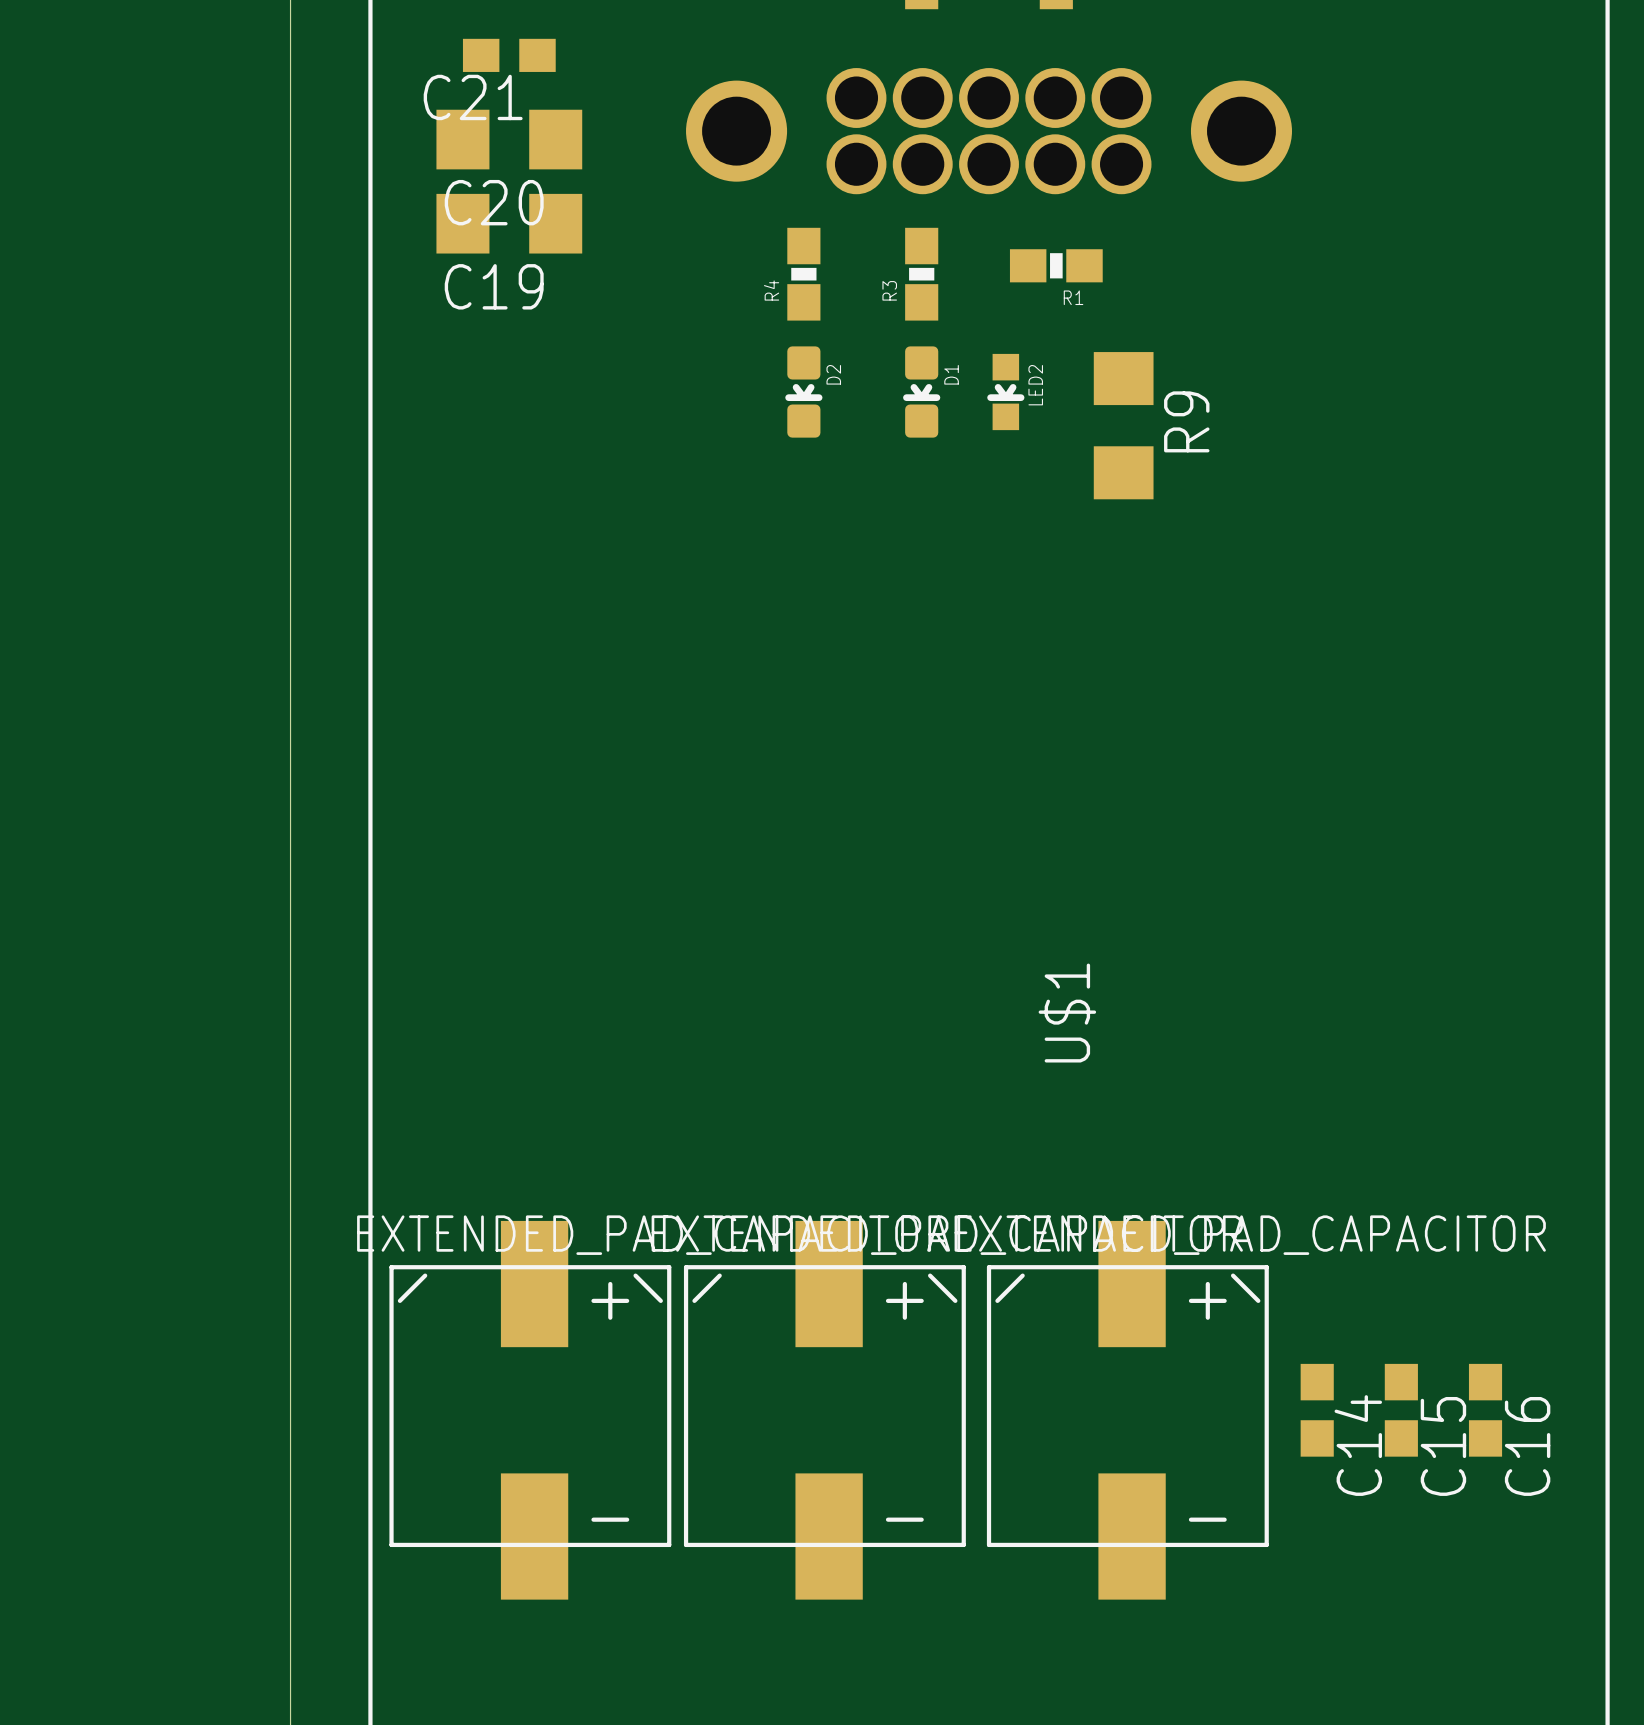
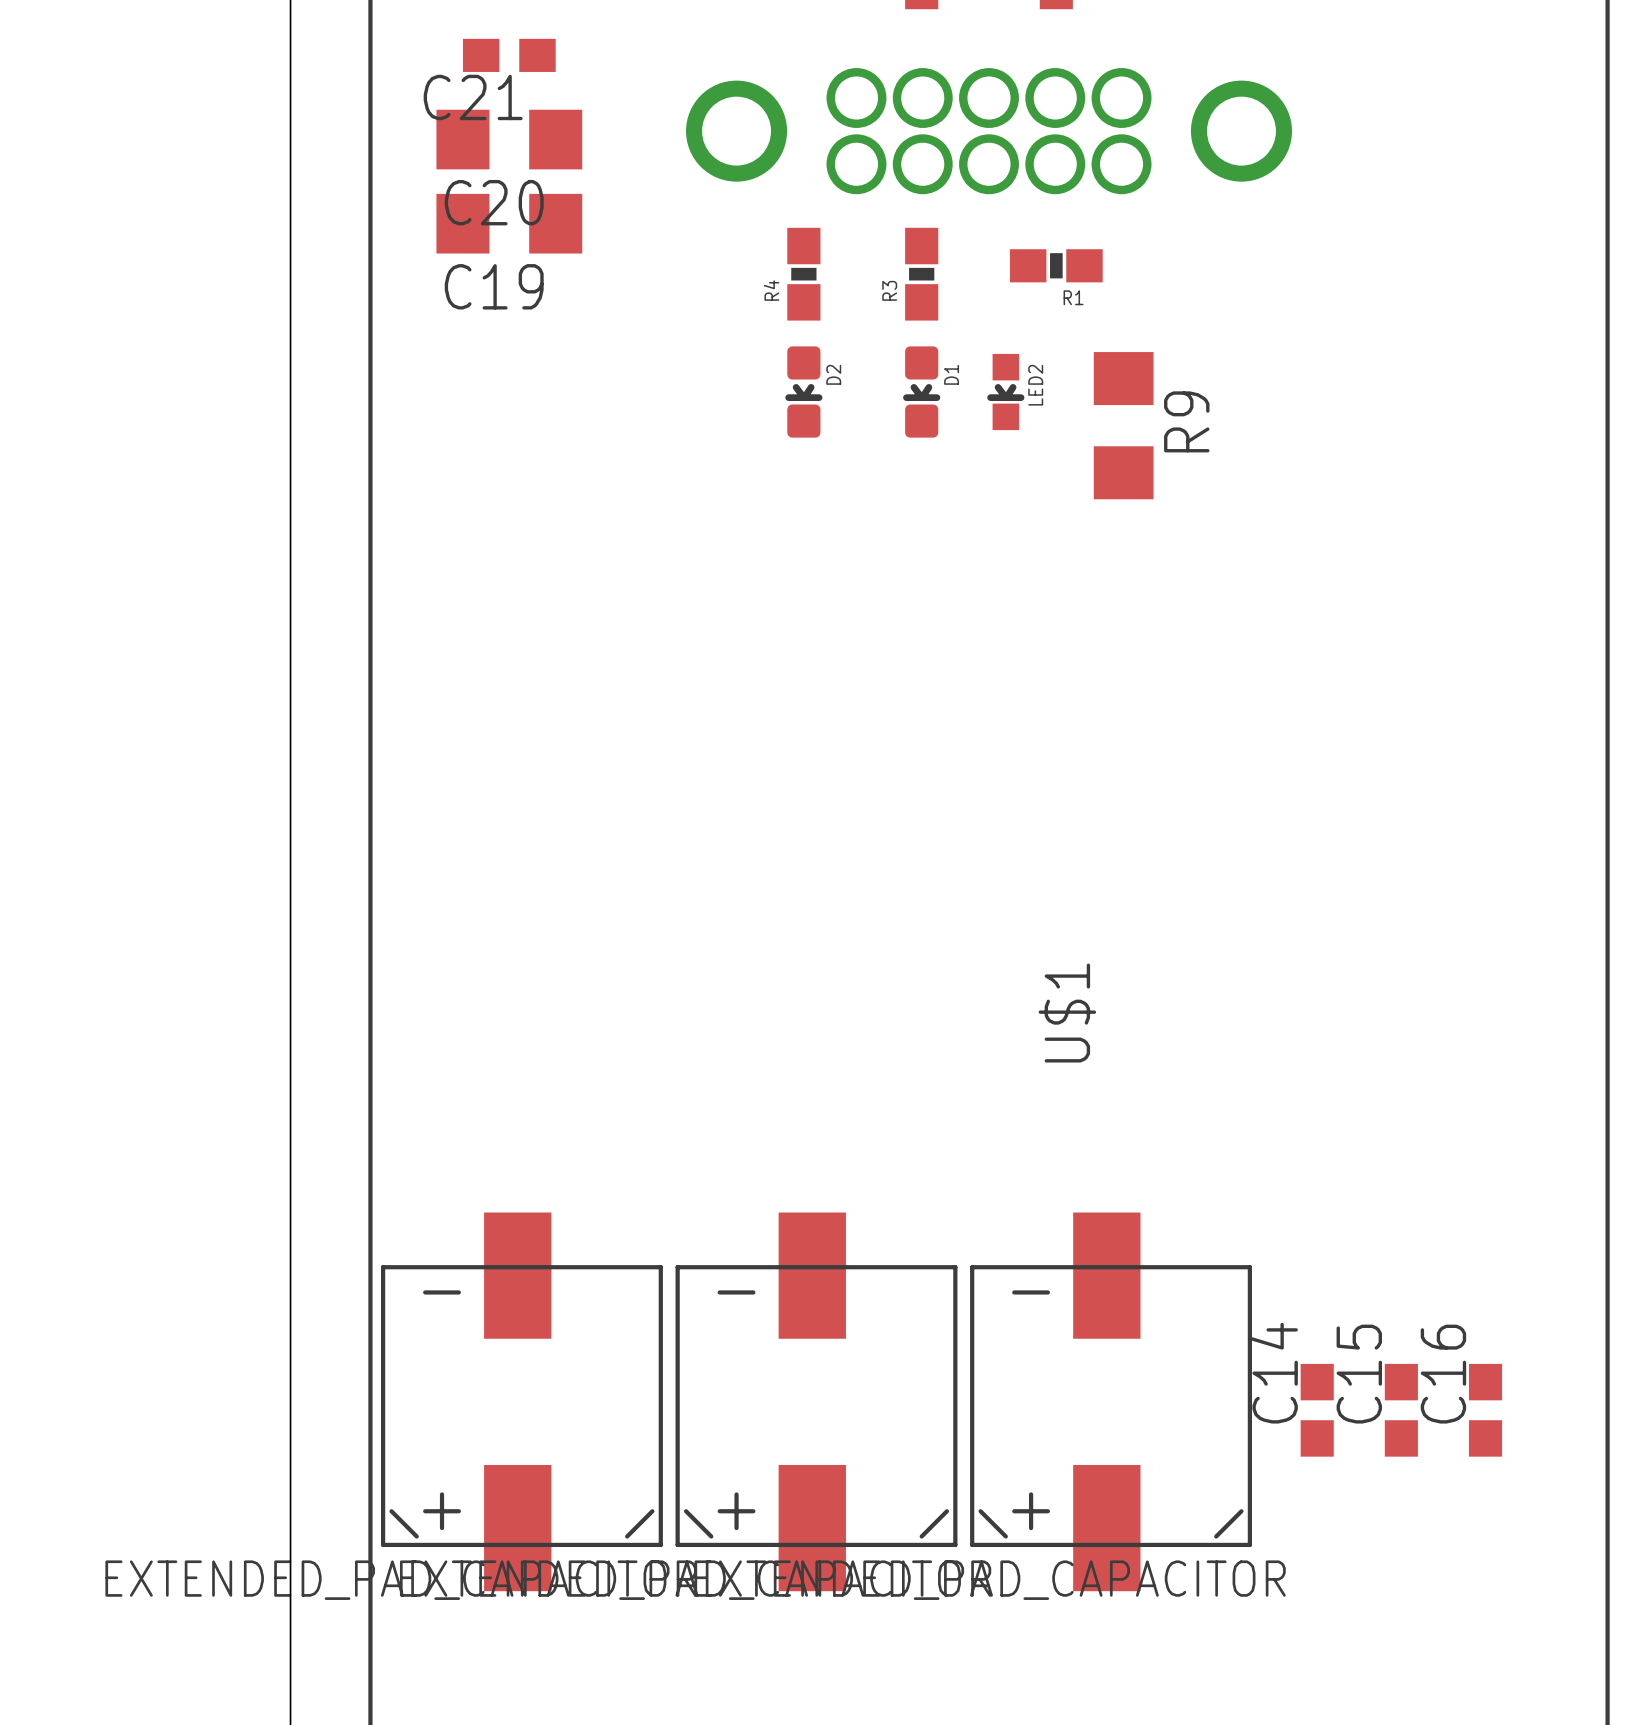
part rotation: 0° (530, 1410) -> 180° (521, 1401)
part rotation: 0° (824, 1410) -> 180° (816, 1401)
part rotation: 0° (1127, 1410) -> 180° (1111, 1401)
C14 name position: C14 (1358, 1445) -> C14 (1274, 1373)
C15 name position: C15 (1443, 1446) -> C15 (1359, 1374)
C16 name position: C16 (1527, 1446) -> C16 (1443, 1374)

